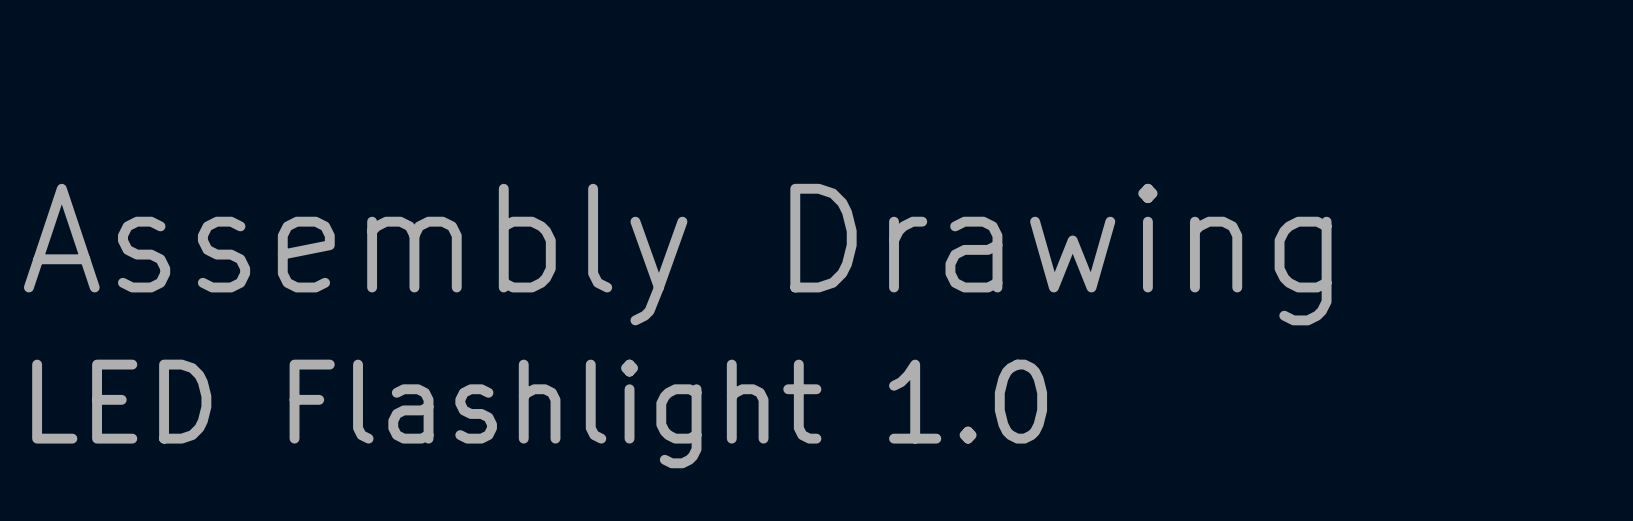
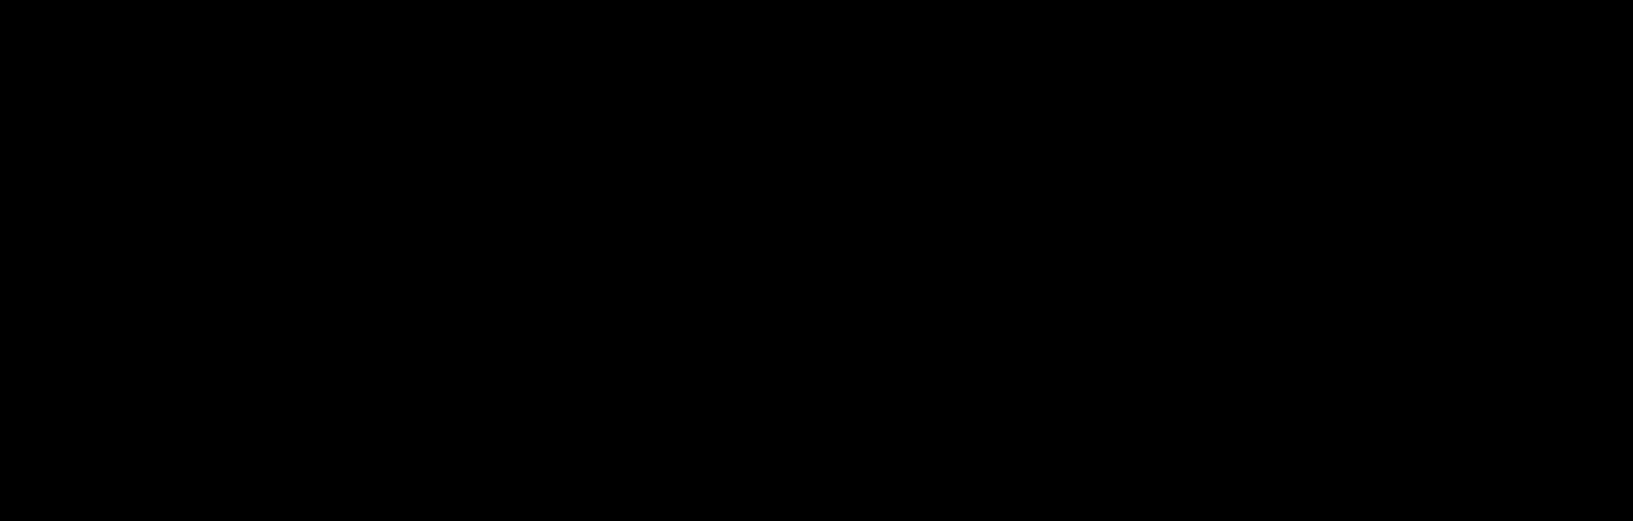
text: Assembly Drawing (677, 254) -> none
text: LED Flashlight 1.0 (539, 413) -> none

